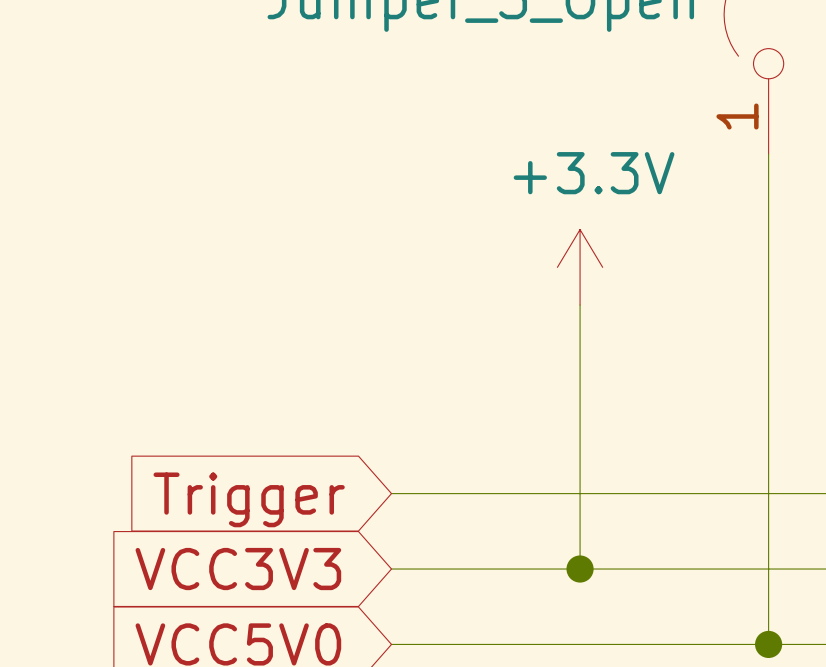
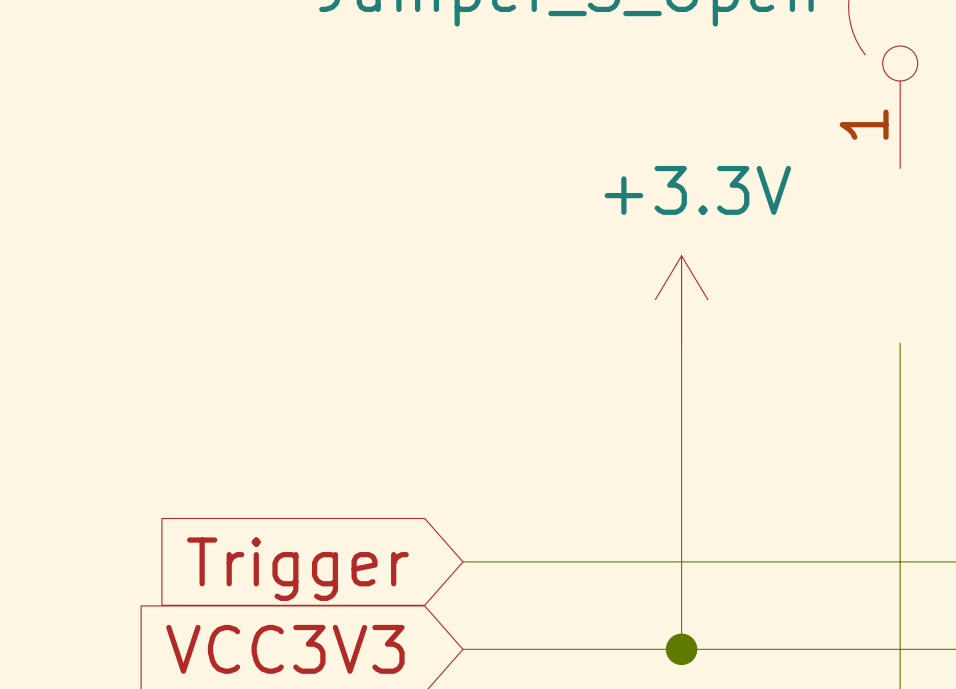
wire: (768, 154) (768, 305) -> none

